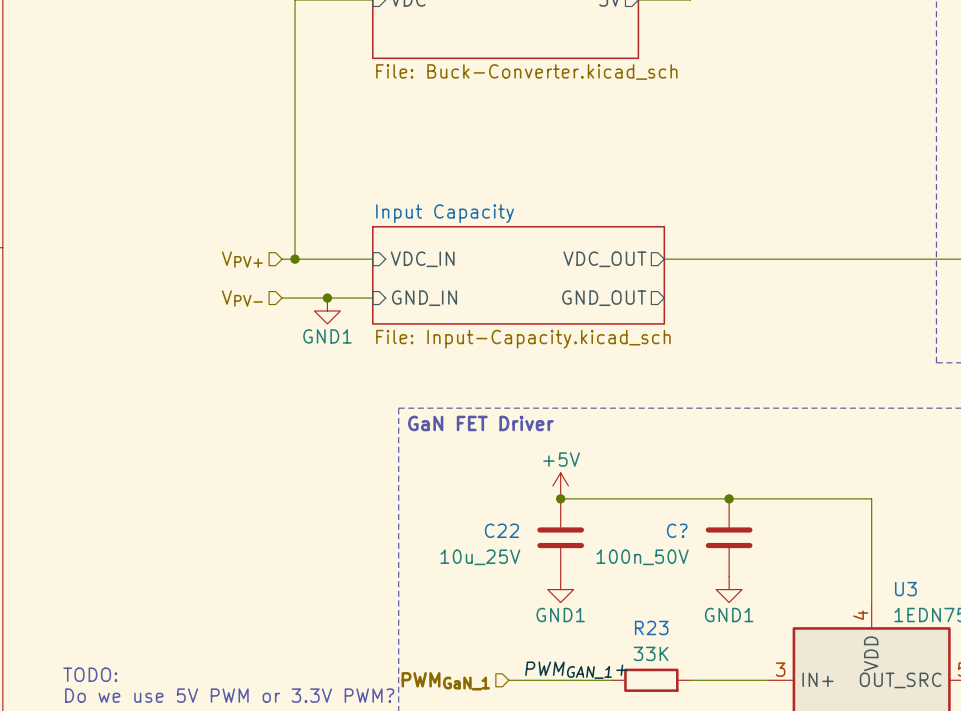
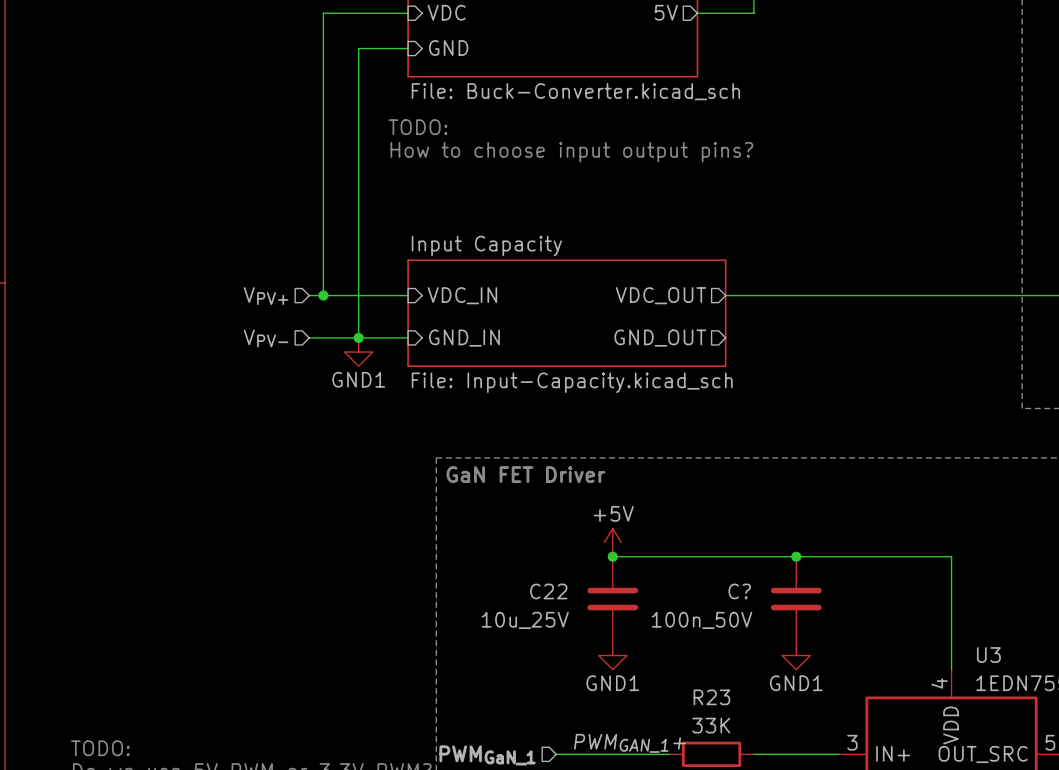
sheet pin: none -> GND (448, 48)
wire: none -> (408, 48) (358, 48) (358, 337)
text: none -> TODO: (417, 127)
text: none -> How to choose input output pins? (571, 152)

